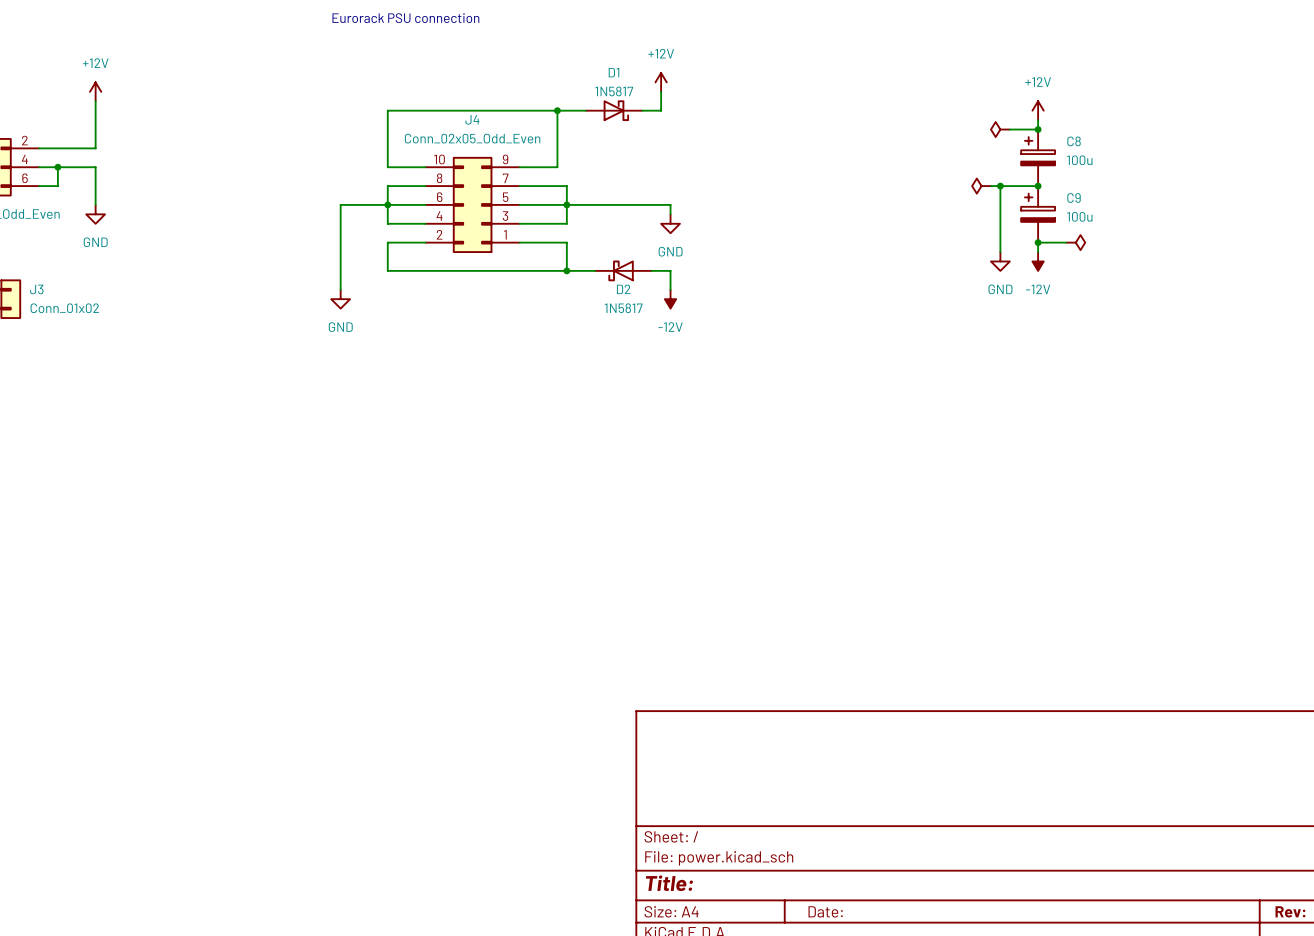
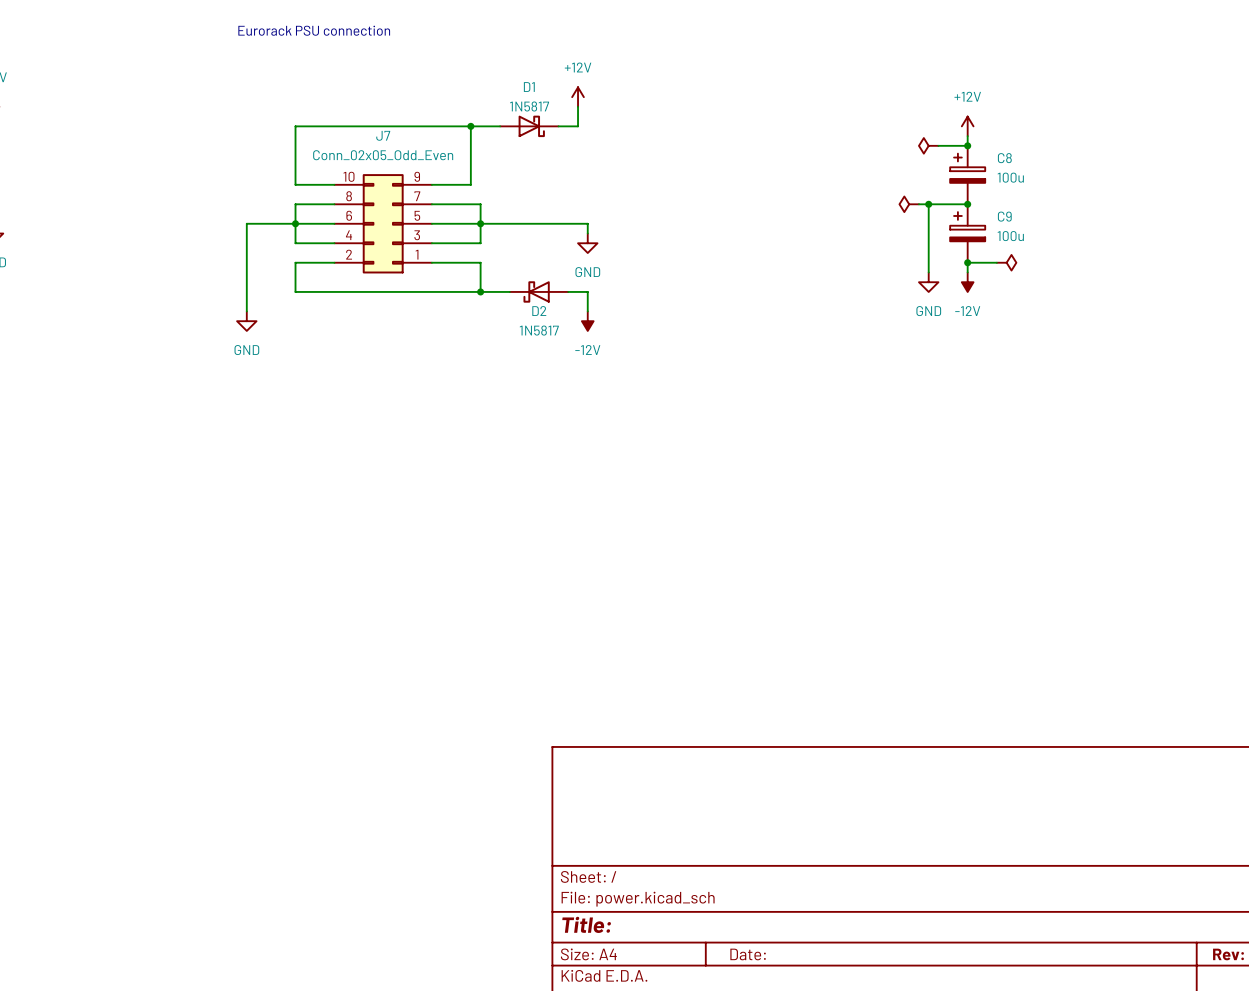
J4 name: J4 (472, 119) -> J7 (383, 135)

